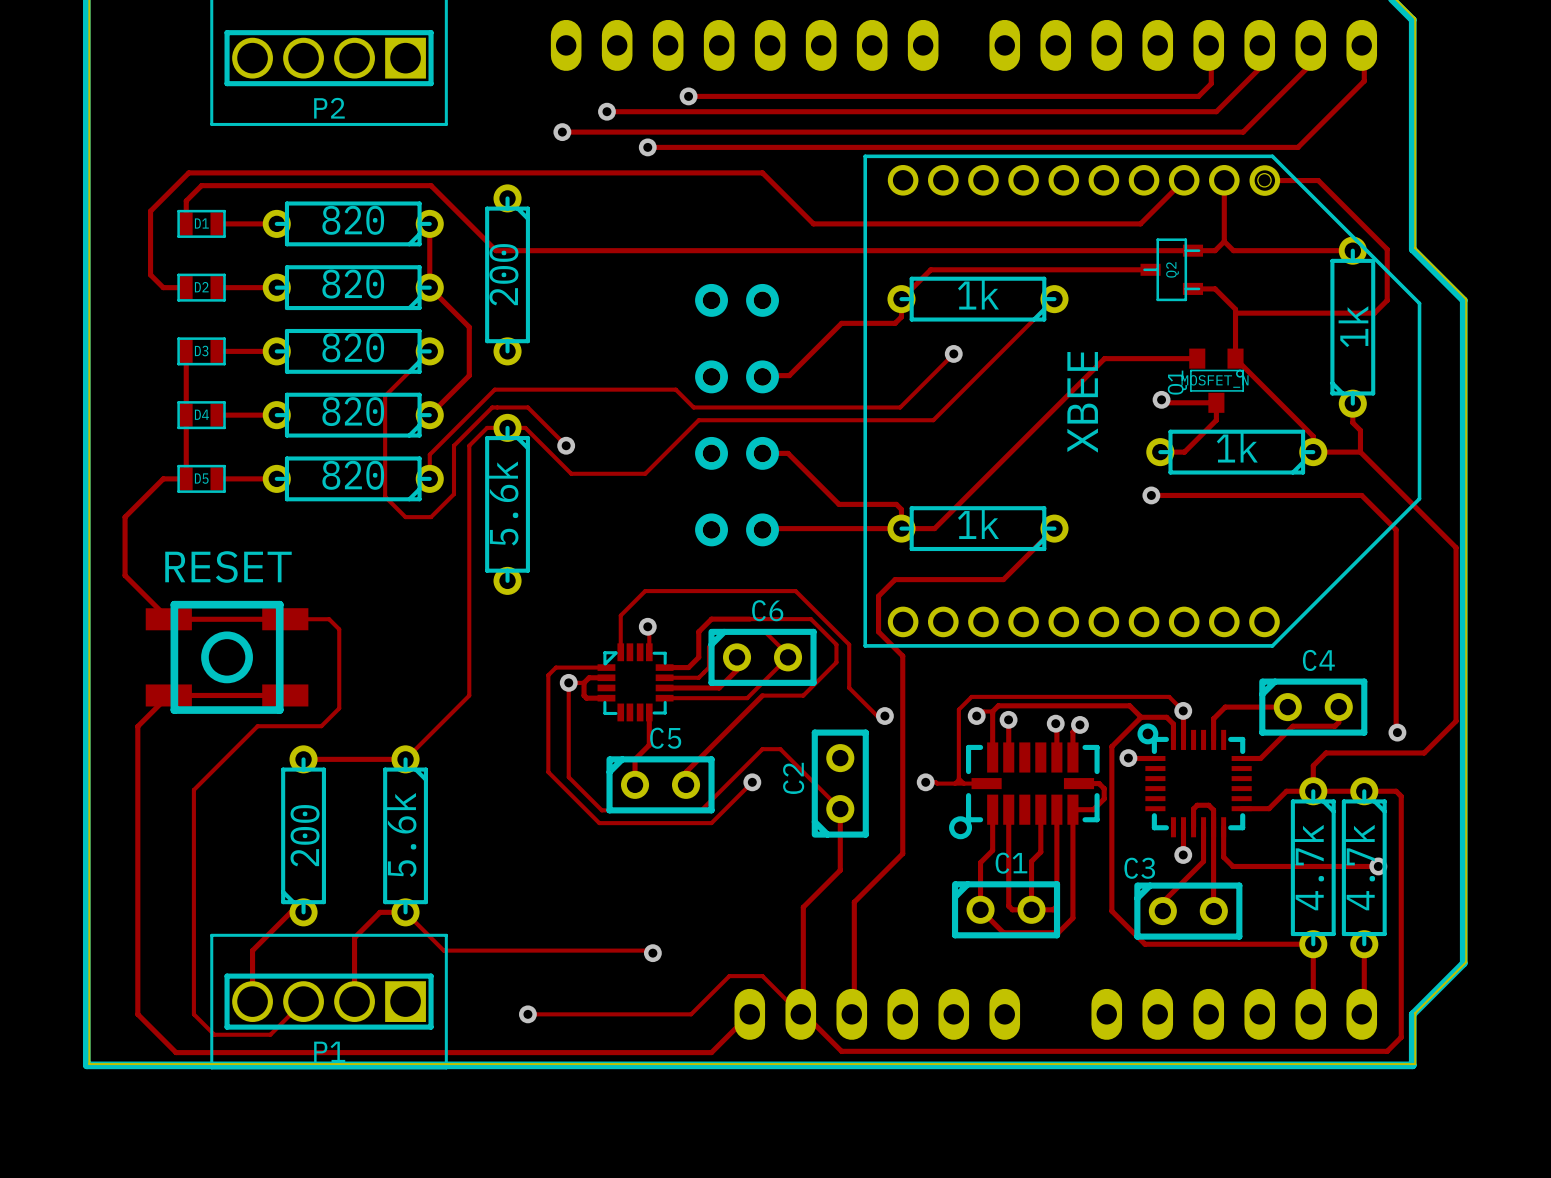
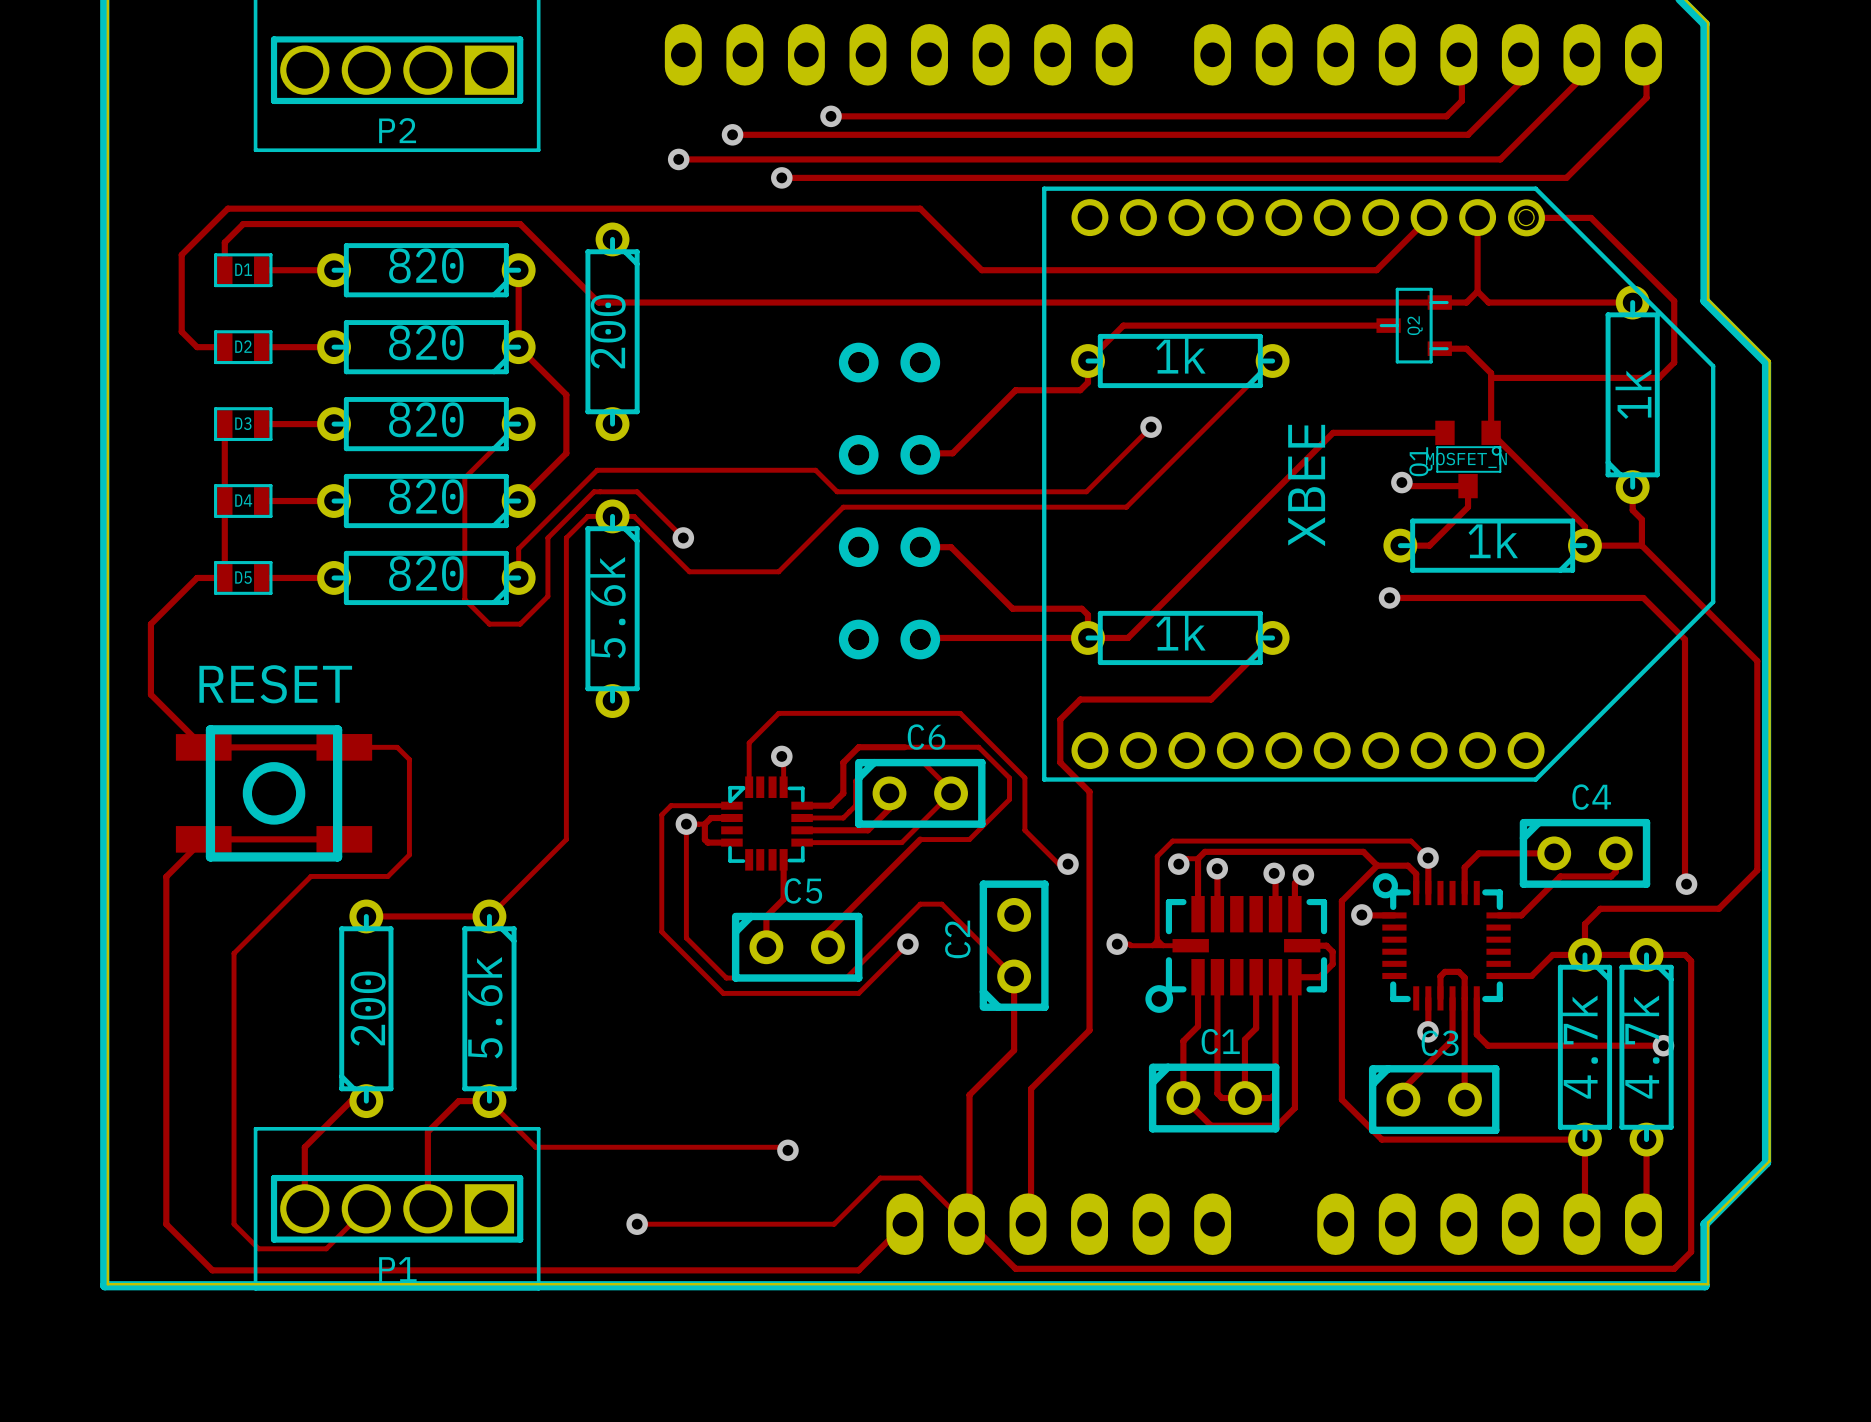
C3 name position: C3 (1139, 868) -> C3 (1440, 1043)

